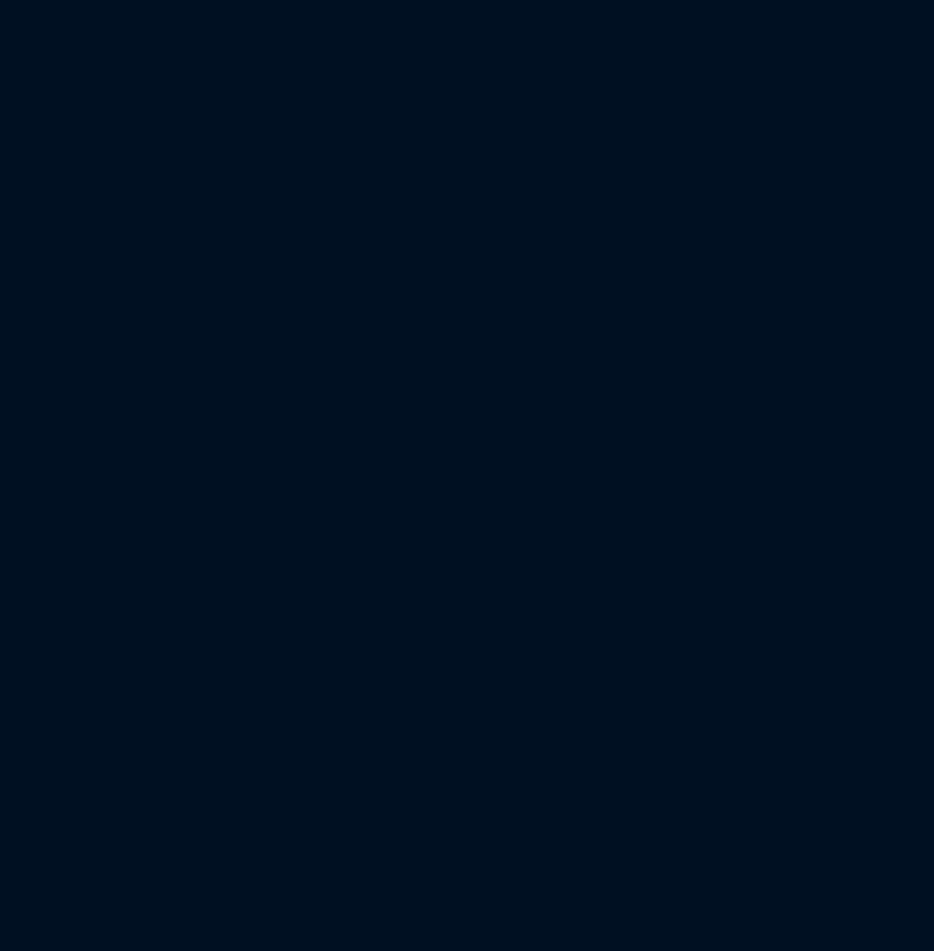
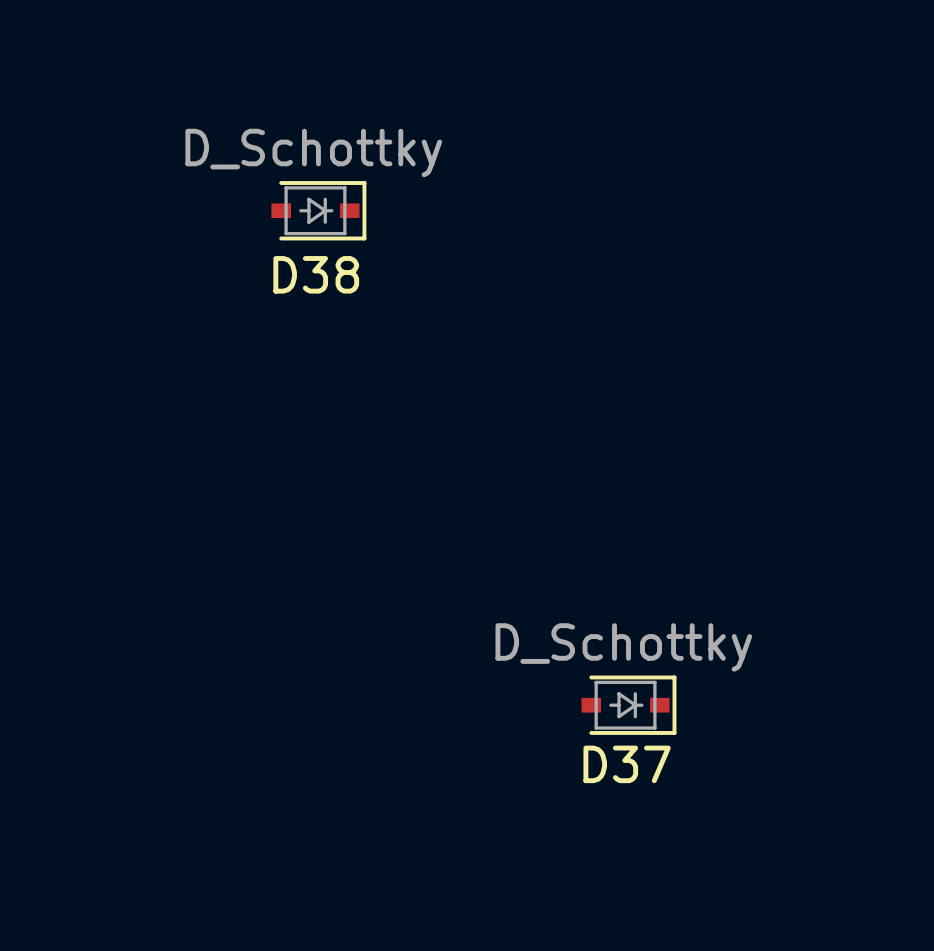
D38: none -> D_Schottky (318, 210)
D37: none -> D_Schottky (628, 705)

